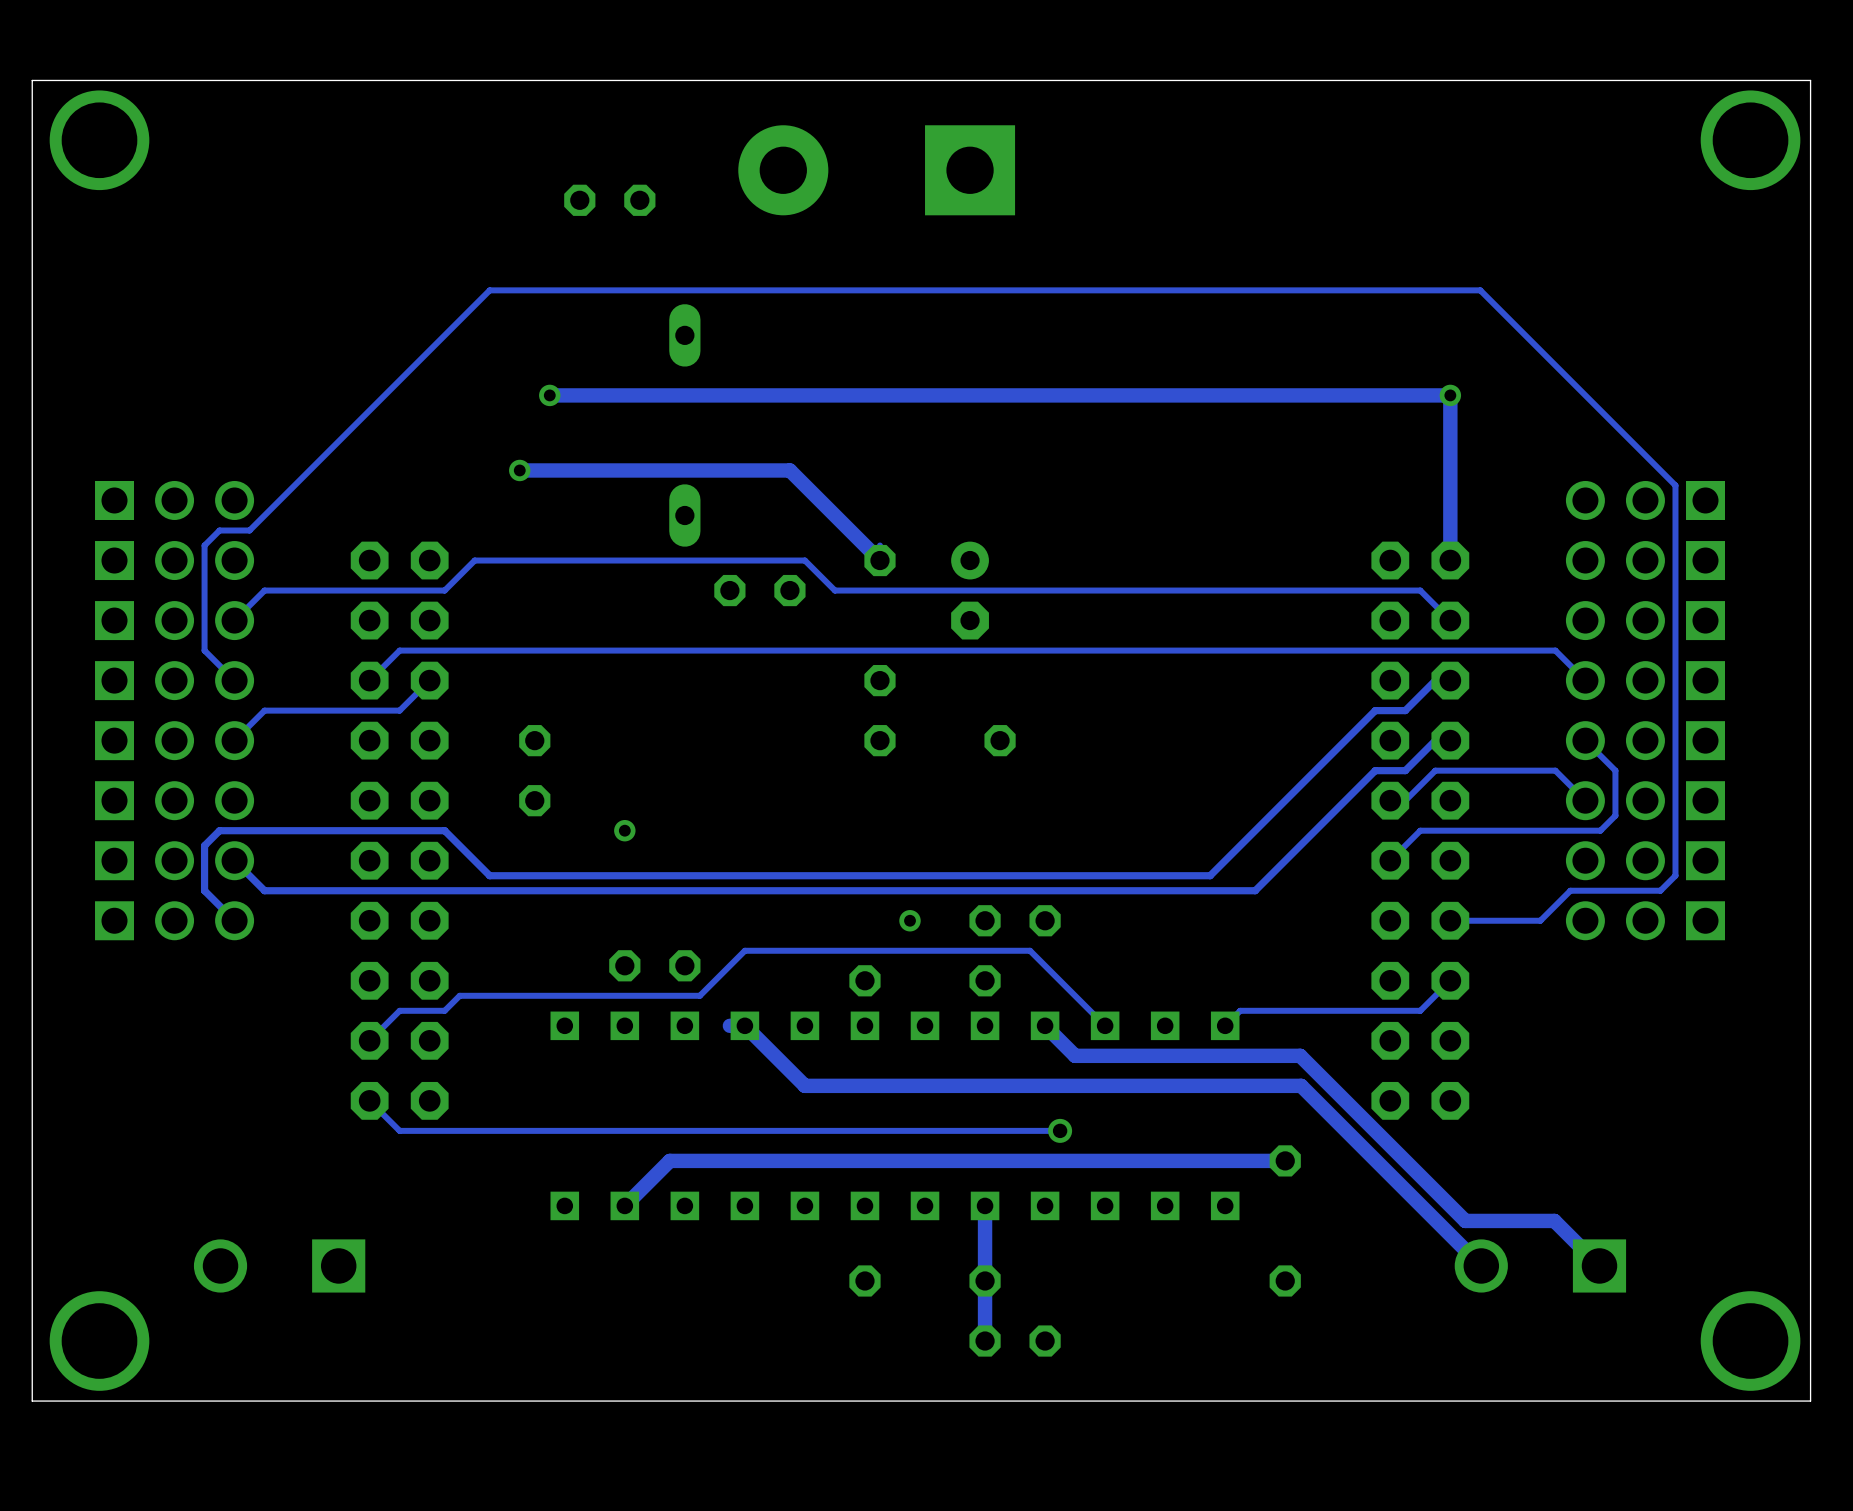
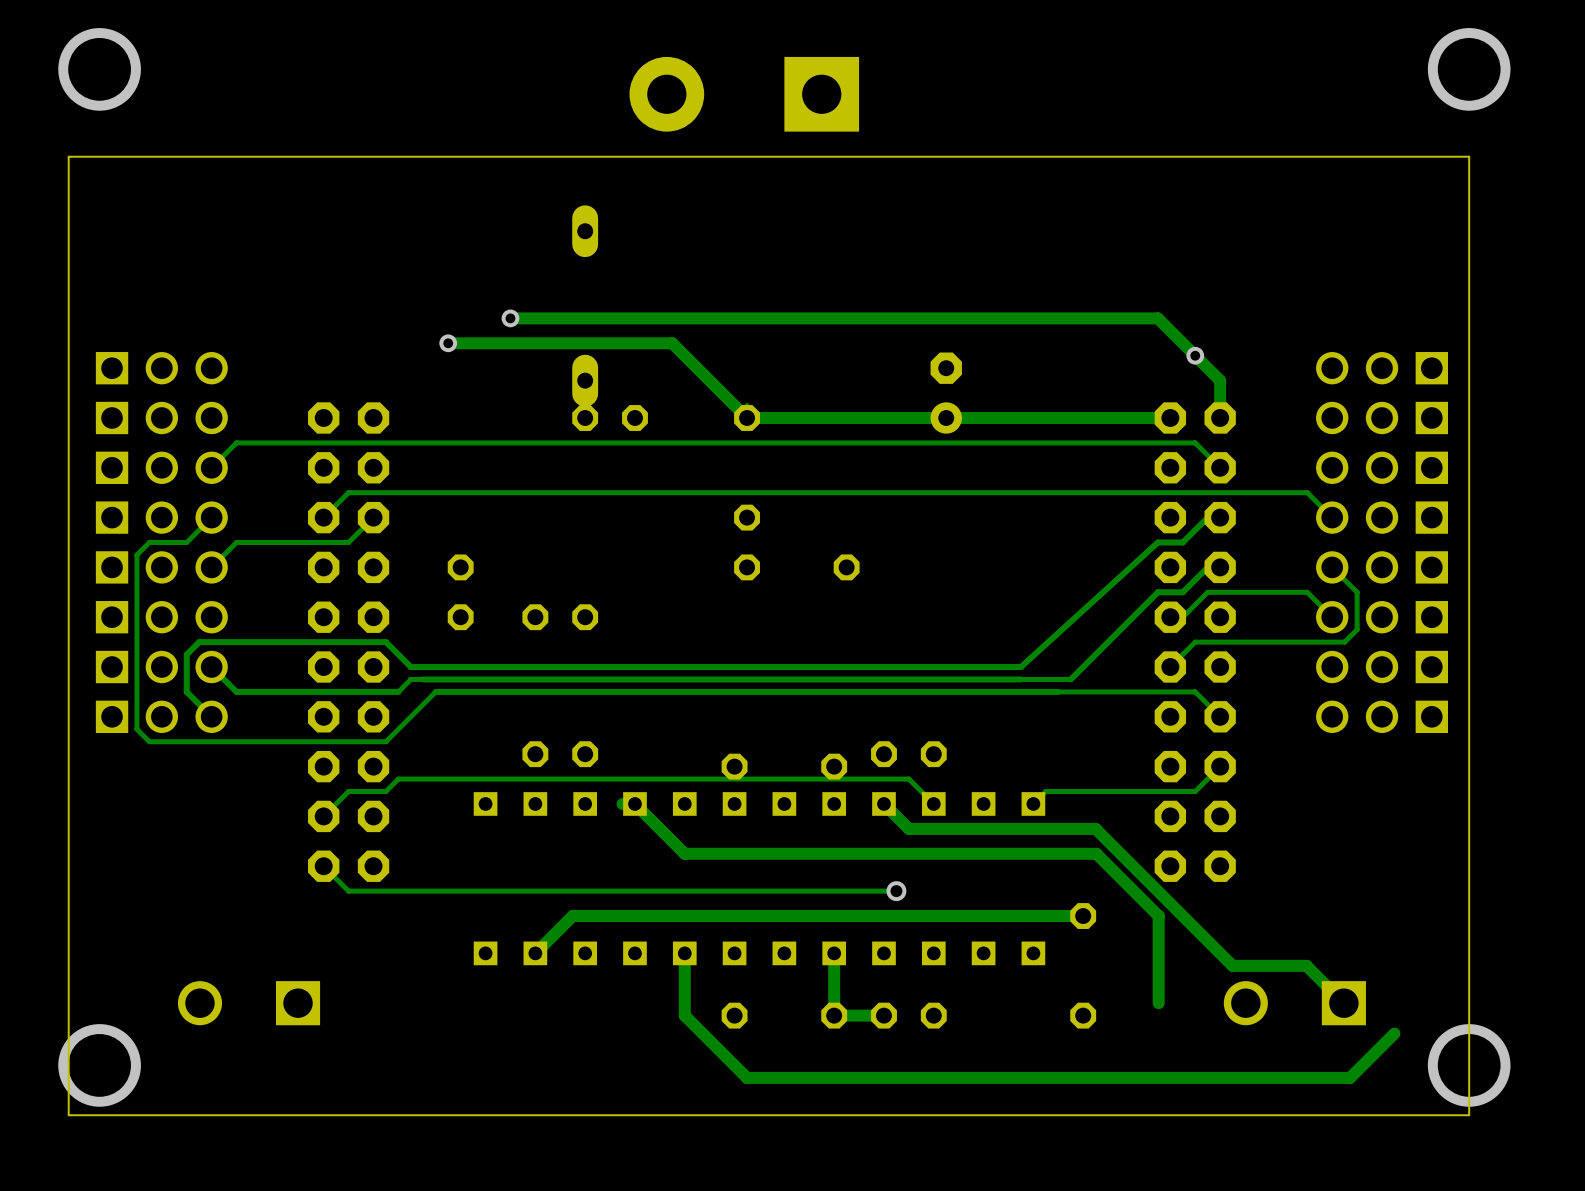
part: (609, 200) -> none
track: (549, 395) (1450, 395) (1450, 515) -> (510, 318) (1157, 318) (1220, 380)
via position: (549, 395) -> (510, 318)
via position: (1450, 395) -> (1195, 355)
track: none -> (1170, 418) (747, 418)
part position: (759, 590) -> (610, 418)
track: (834, 590) (804, 560) (474, 560) (444, 590) -> (709, 442) (385, 442)
part rotation: 0° (970, 590) -> 180° (946, 393)
part position: (970, 590) -> (946, 393)
track: (234, 680) (204, 650) (204, 545) (219, 530) (249, 530) (489, 290) (1480, 290) (1675, 485) (1675, 875) (1660, 890) (1570, 890) (1540, 920) (1450, 920) -> (211, 517) (186, 542) (149, 542) (136, 554) (136, 729) (149, 741) (385, 741) (435, 691)
track: (1375, 710) (1210, 875) -> (1157, 542) (1020, 667) (410, 667)
part: none -> (560, 617)
via: (624, 830) -> none
track: (474, 860) (489, 875) -> none
track: (1270, 875) (1255, 890) -> (1070, 679) (1020, 679)
track: (504, 890) (459, 890) -> (423, 679) (410, 679) (398, 691)
track: none -> (1058, 691) (1195, 691) (1220, 716)
via: (910, 920) -> none
part position: (1015, 920) -> (908, 754)
track: (1075, 995) (1030, 950) (744, 950) (699, 995) -> (908, 779) (597, 779)
track: (1376, 1160) (1481, 1265) -> (1158, 916) (1158, 1003)
track: none -> (684, 953) (684, 1015) (747, 1077) (1350, 1077) (1394, 1033)
track: (985, 1280) (985, 1341) -> (834, 1015) (883, 1015)
part position: (1015, 1341) -> (908, 1015)
board edge: (1750, 1401) (1810, 1401) (1810, 80) (32, 80) (32, 1401) (62, 1401) -> (1469, 1115) (1469, 156) (68, 156) (68, 1115)

